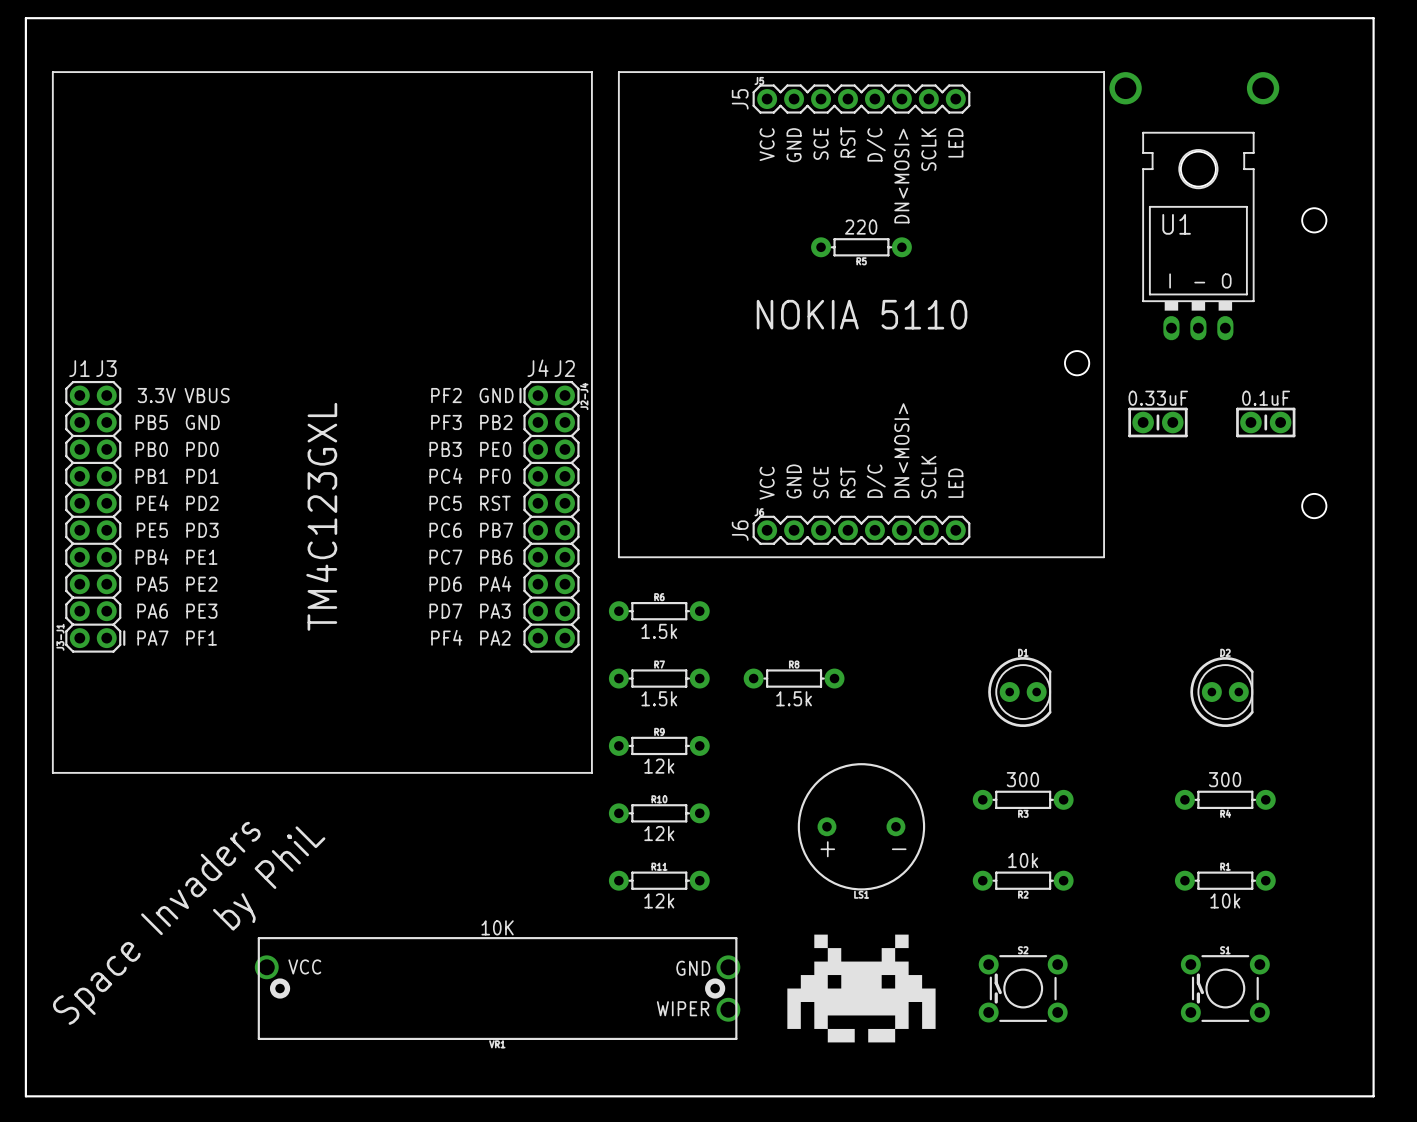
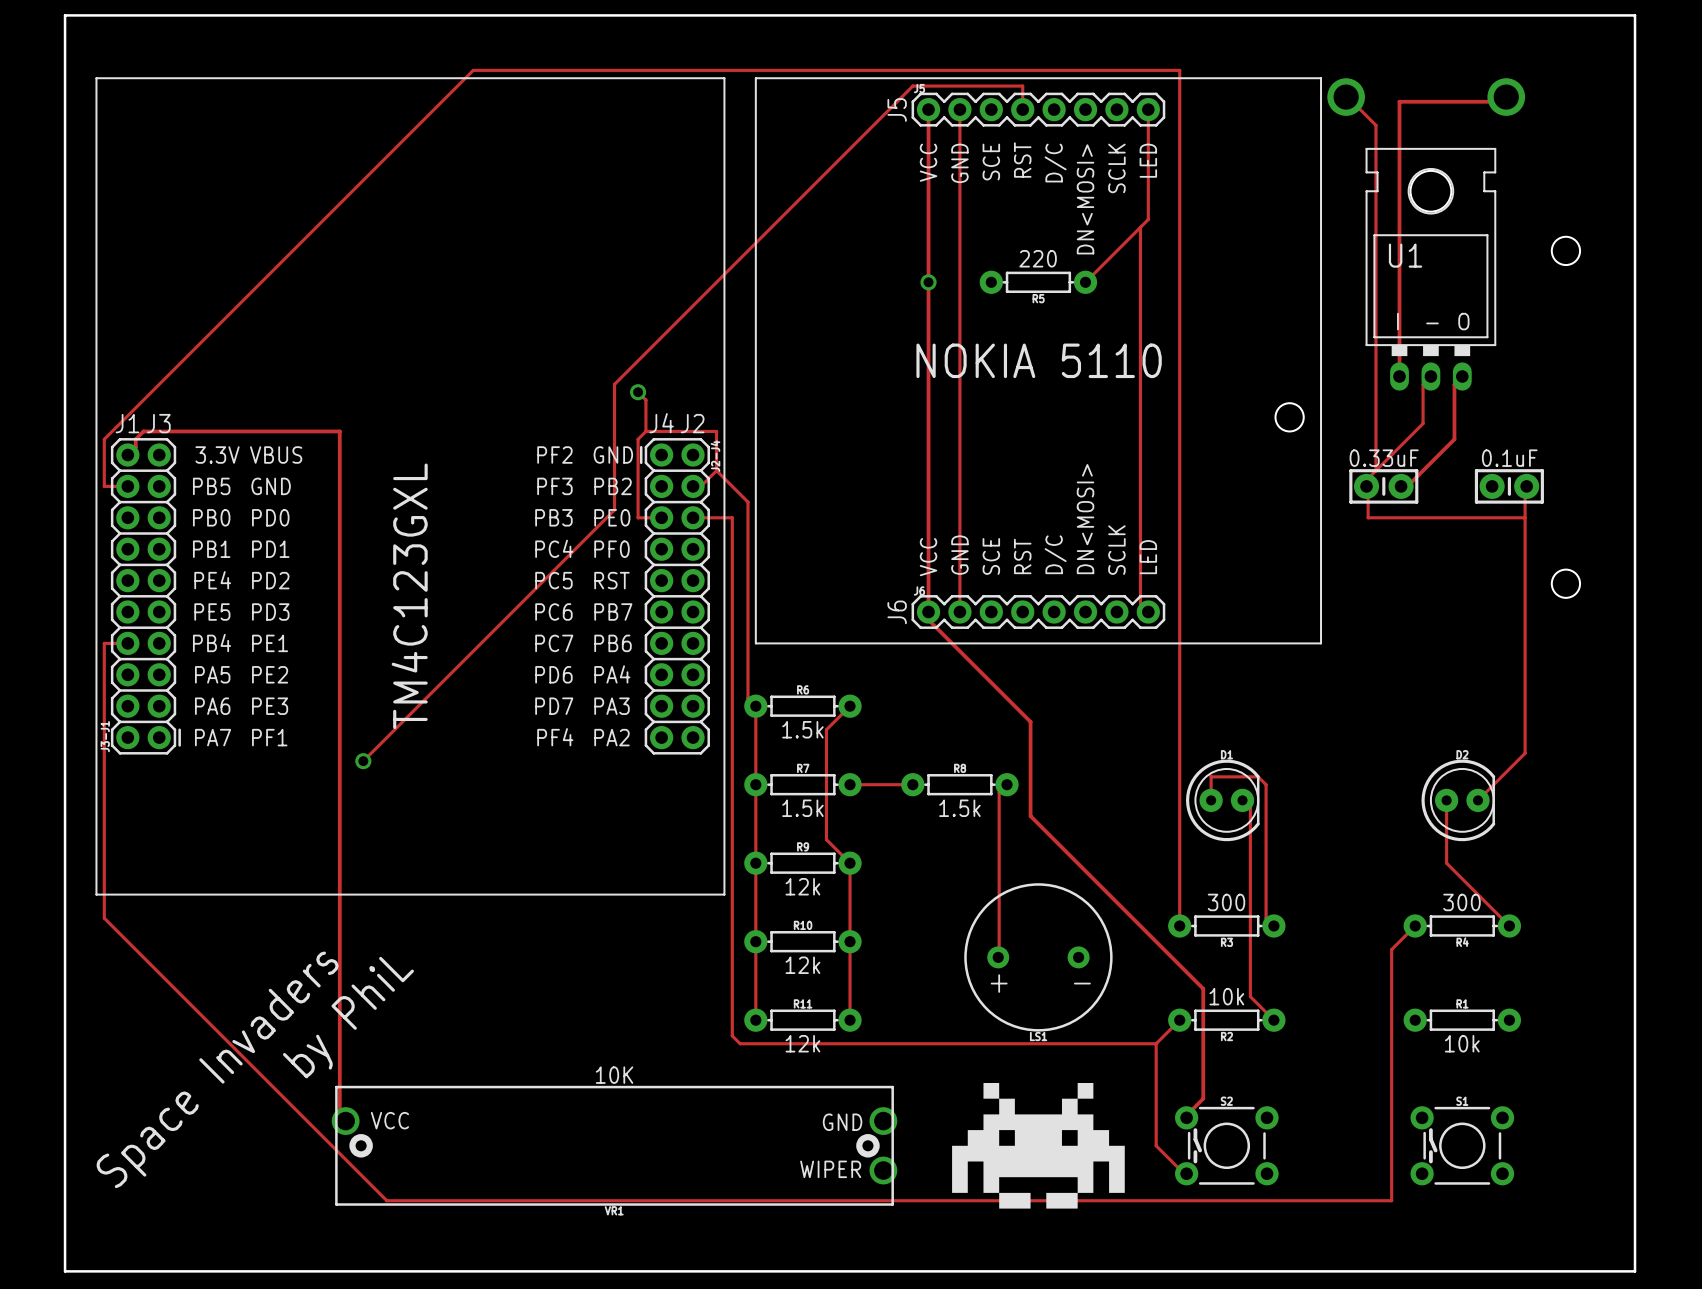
track: none -> (1346, 97) (1375, 125) (1375, 470)
track: none -> (1506, 97) (1501, 101) (1399, 101) (1399, 376)
track: none -> (928, 109) (928, 619) (1030, 721) (1030, 816) (1203, 988) (1203, 1098) (1187, 1114) (1186, 1117)
track: none -> (959, 109) (959, 612)
track: none -> (1022, 109) (1022, 86) (912, 86) (614, 384) (614, 509) (363, 761)
track: none -> (1148, 109) (1148, 219) (1085, 282)
track: none -> (1140, 227) (1140, 604) (1148, 612)
via: none -> (928, 282)
track: none -> (1430, 376) (1423, 384) (1423, 423) (1368, 478) (1368, 517) (1525, 517)
track: none -> (1462, 376) (1454, 384) (1454, 439) (1407, 486) (1401, 486)
track: none -> (638, 392) (645, 400) (645, 431)
via: none -> (638, 392)
track: none -> (645, 431) (638, 439) (638, 517) (661, 517)
track: none -> (645, 431) (716, 431) (716, 470)
track: none -> (127, 455) (135, 447) (135, 439) (143, 431) (339, 431) (339, 1114) (345, 1121)
track: none -> (716, 470) (700, 486) (693, 486)
track: none -> (716, 470) (747, 502) (747, 698) (755, 706) (755, 1020)
track: none -> (127, 486) (104, 486) (104, 439) (473, 70) (1179, 70) (1179, 925)
track: none -> (1526, 486) (1525, 486) (1525, 753) (1478, 800)
track: none -> (693, 517) (732, 517) (732, 1035) (740, 1043) (1156, 1043)
track: none -> (127, 643) (104, 643) (104, 918) (386, 1200) (1391, 1200) (1391, 949) (1415, 925)
track: none -> (850, 706) (826, 729) (826, 839) (850, 863) (850, 1020)
via: none -> (363, 761)
track: none -> (850, 784) (912, 784)
track: none -> (1007, 784) (999, 792) (998, 957)
track: none -> (1211, 800) (1211, 776) (1258, 776) (1266, 784) (1266, 918) (1273, 925)
track: none -> (1242, 800) (1250, 808) (1250, 996) (1273, 1020)
track: none -> (1446, 800) (1446, 863) (1509, 925)
track: none -> (1179, 1020) (1156, 1043)
track: none -> (1156, 1043) (1156, 1145) (1186, 1173)

